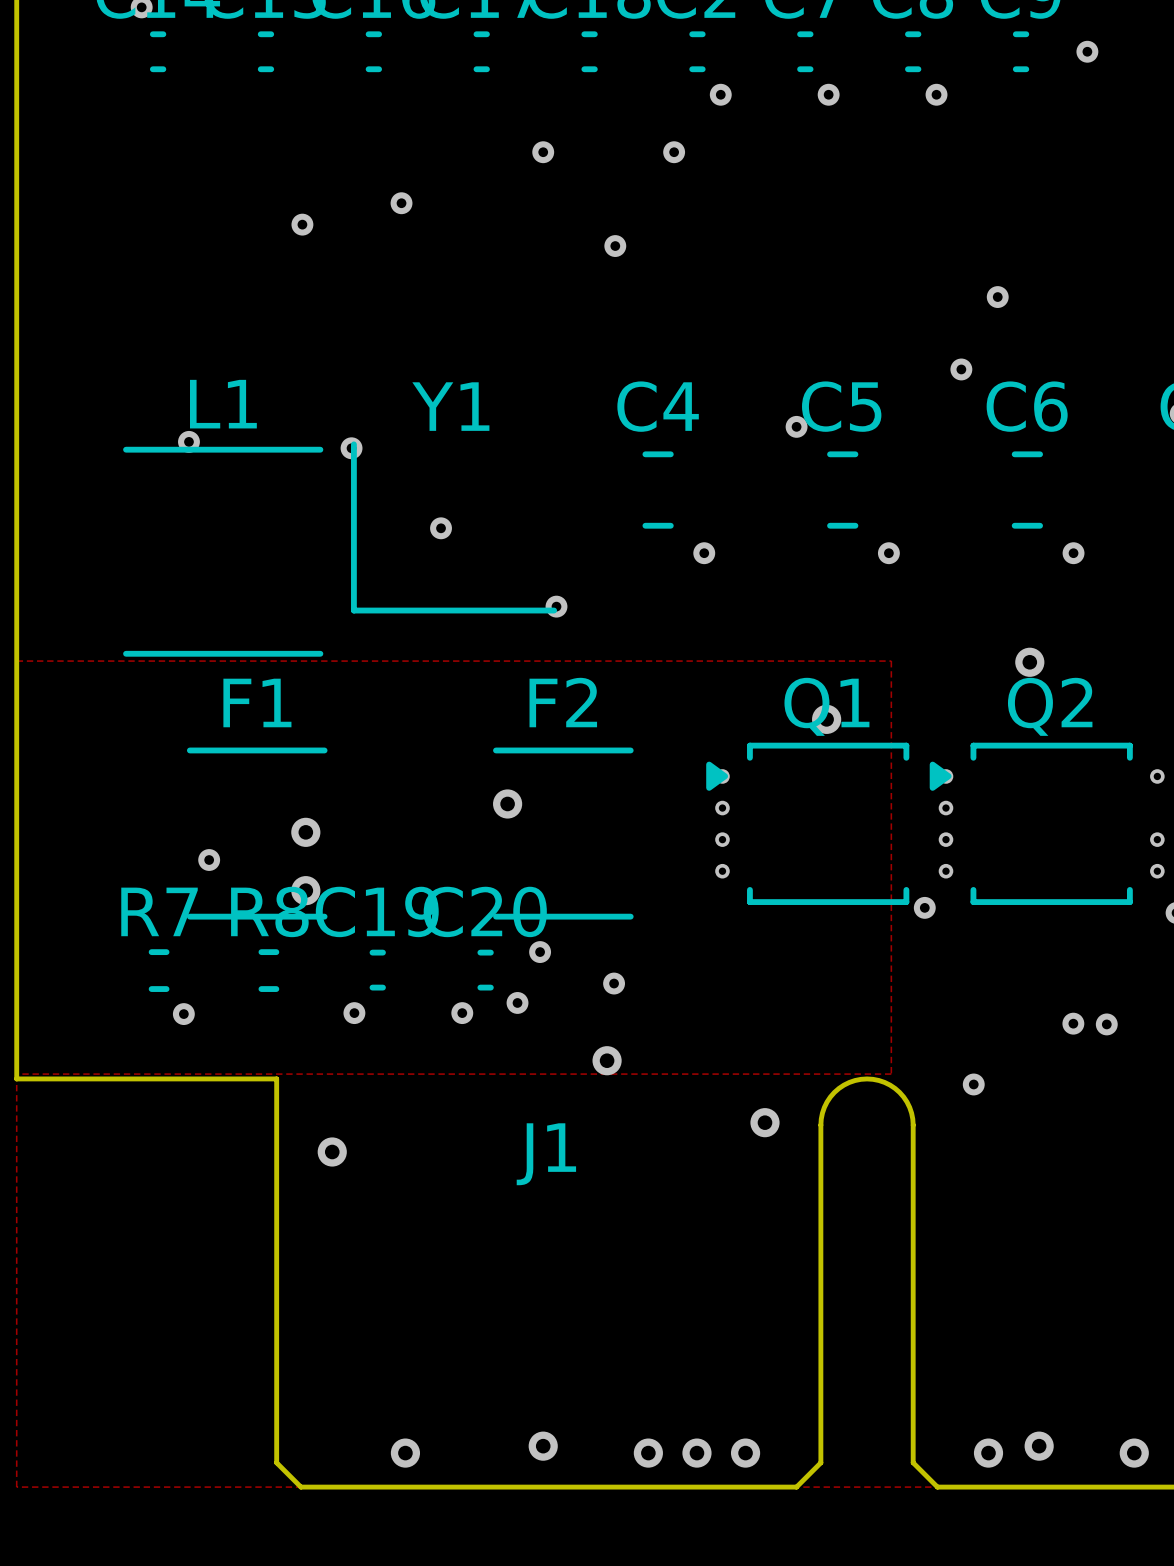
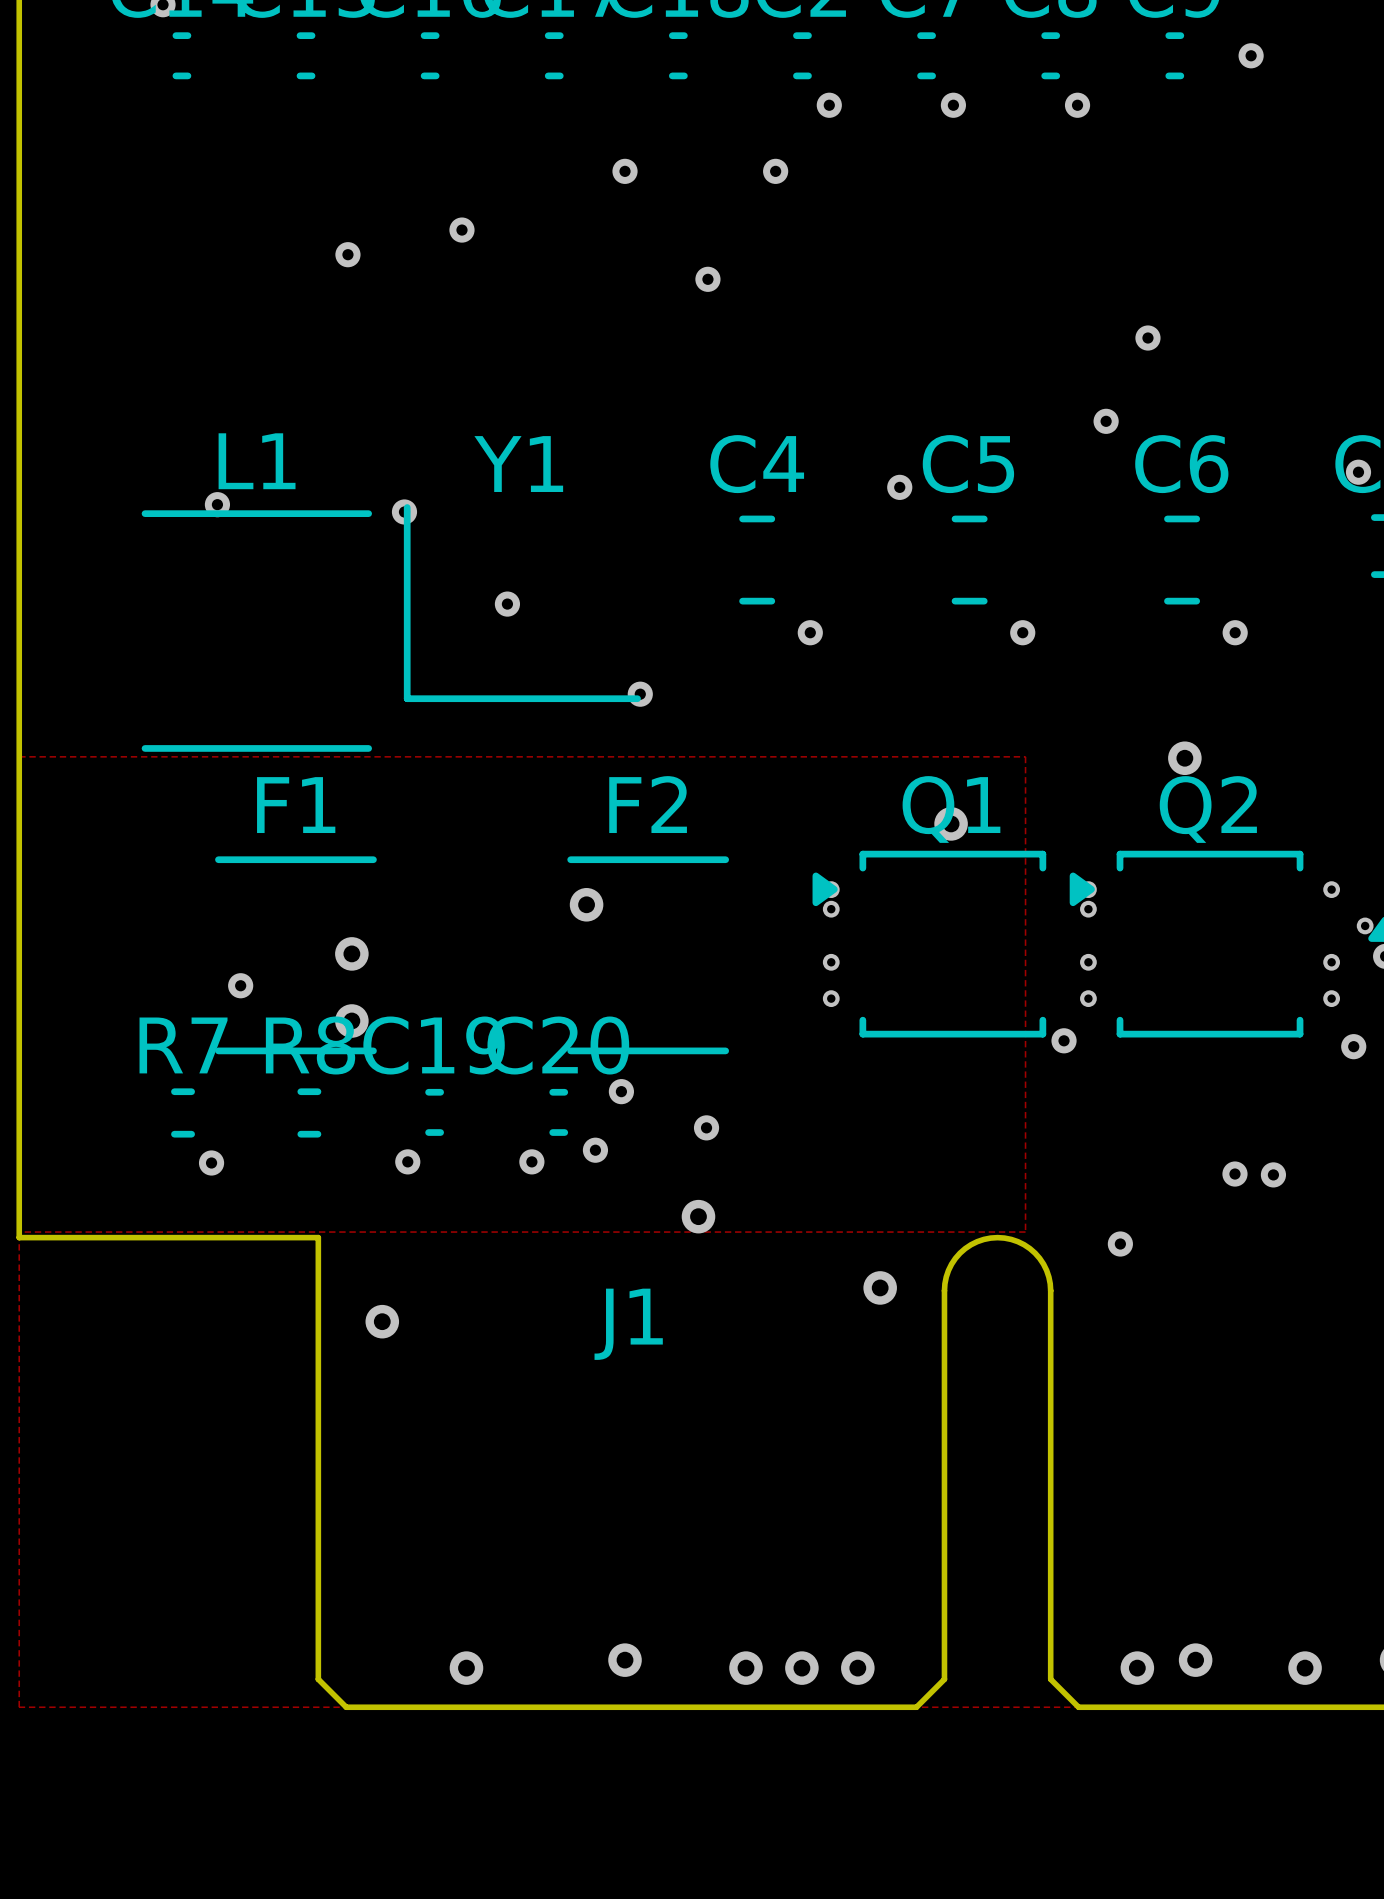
via position: (796, 426) -> (899, 487)
via position: (507, 803) -> (586, 904)
via position: (722, 808) -> (831, 909)
via position: (945, 808) -> (1088, 909)

